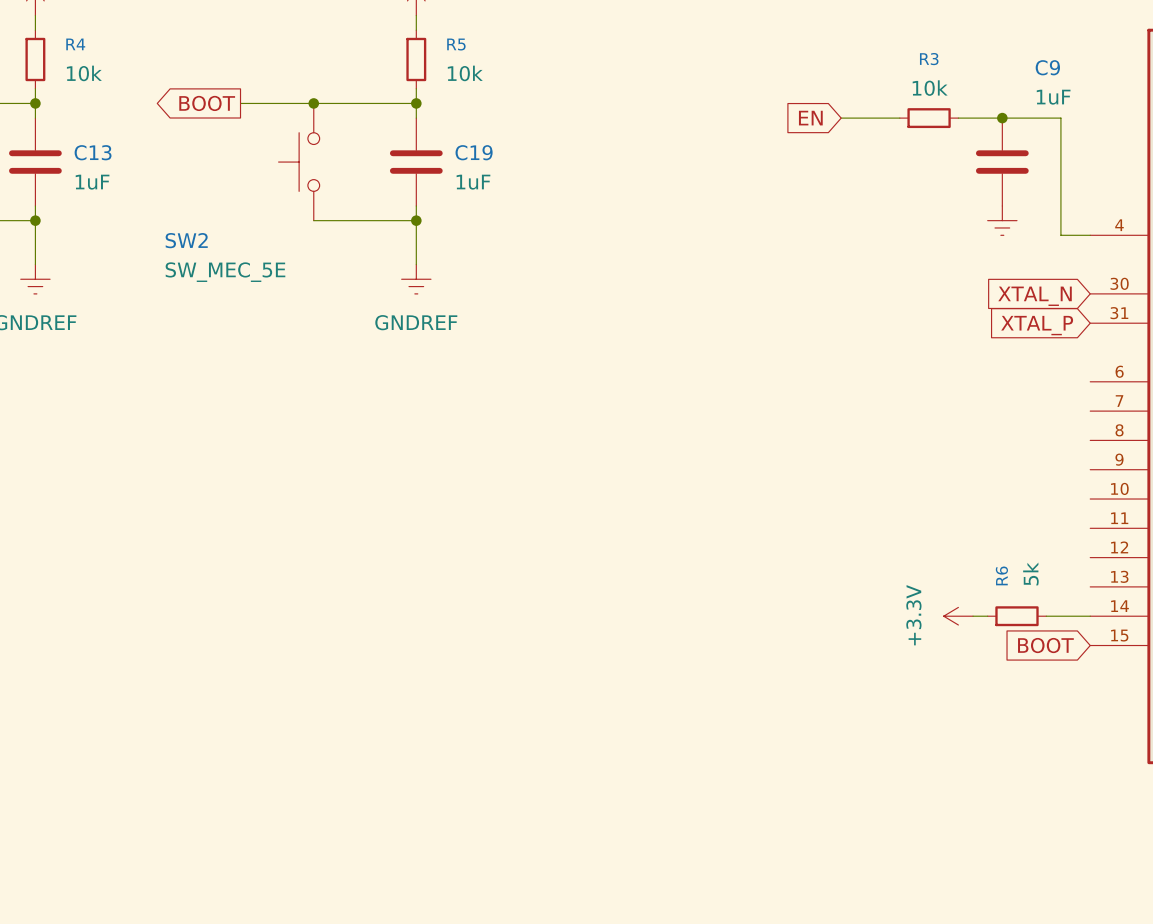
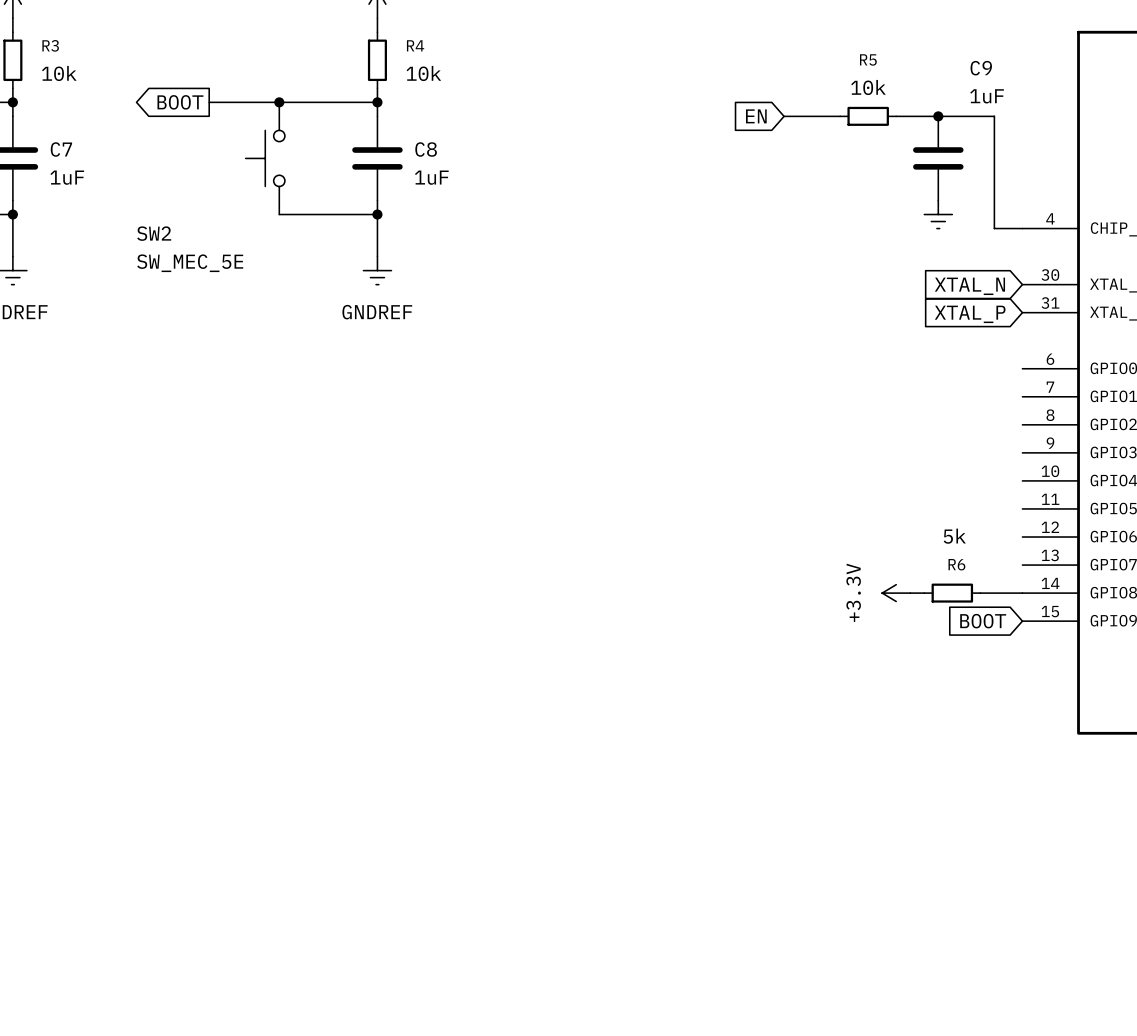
R4 name: R4 (75, 44) -> R3 (50, 45)
R5 name: R5 (456, 44) -> R4 (415, 45)
R3 name: R3 (929, 59) -> R5 (868, 59)
C13 name: C13 (93, 152) -> C7 (61, 149)
C19 name: C19 (474, 152) -> C8 (426, 149)
R6 value rotation: 0° (1030, 573) -> 90° clockwise (954, 536)
R6 name rotation: 0° (1001, 575) -> 90° clockwise (956, 564)

